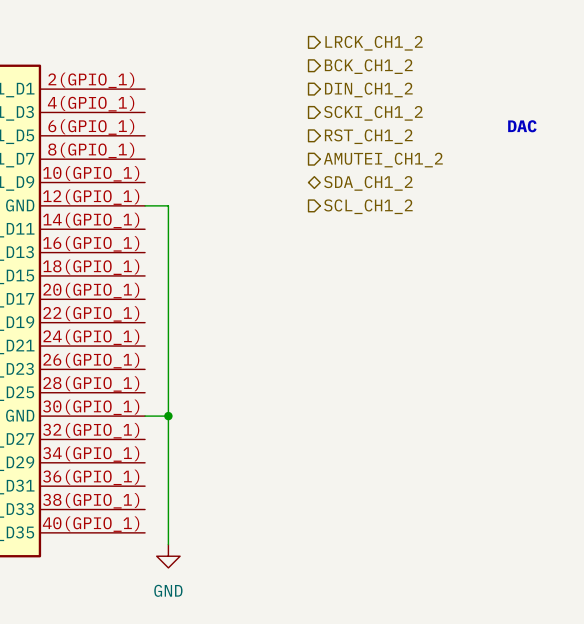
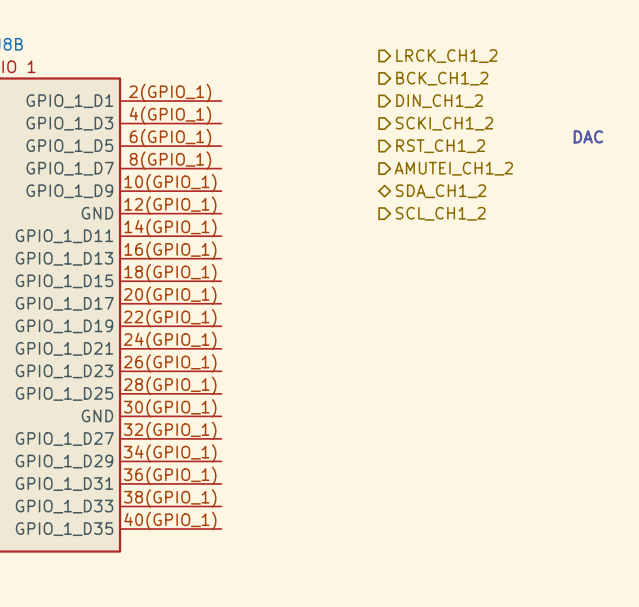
wire: (145, 205) (168, 205) (168, 544) -> none
wire: (145, 416) (168, 416) -> none
junction: (168, 416) -> none
power symbol: GND (168, 556) -> none

